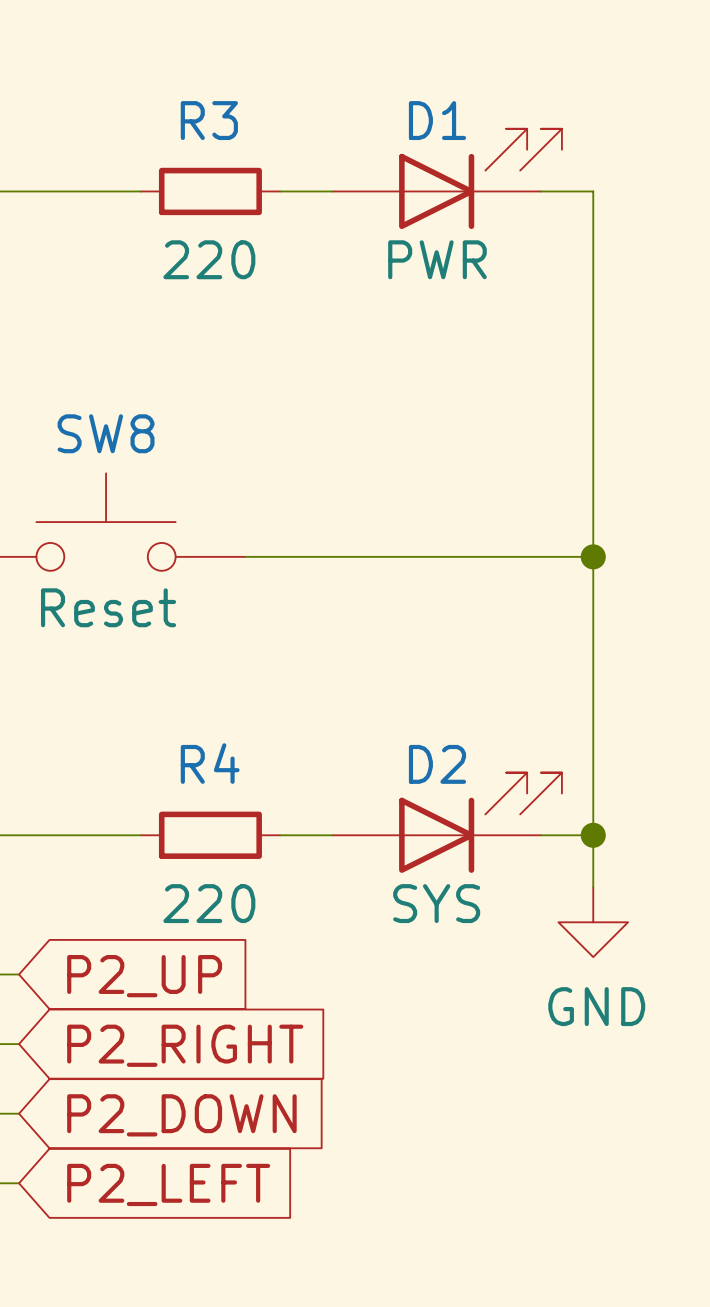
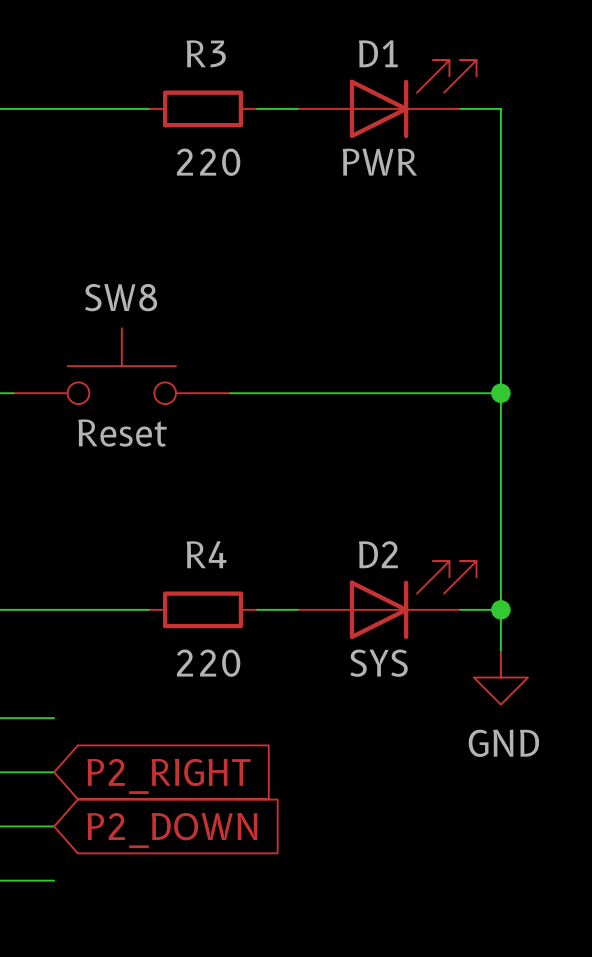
global label: P2_UP (144, 976) -> none
global label: P2_LEFT (168, 1184) -> none

